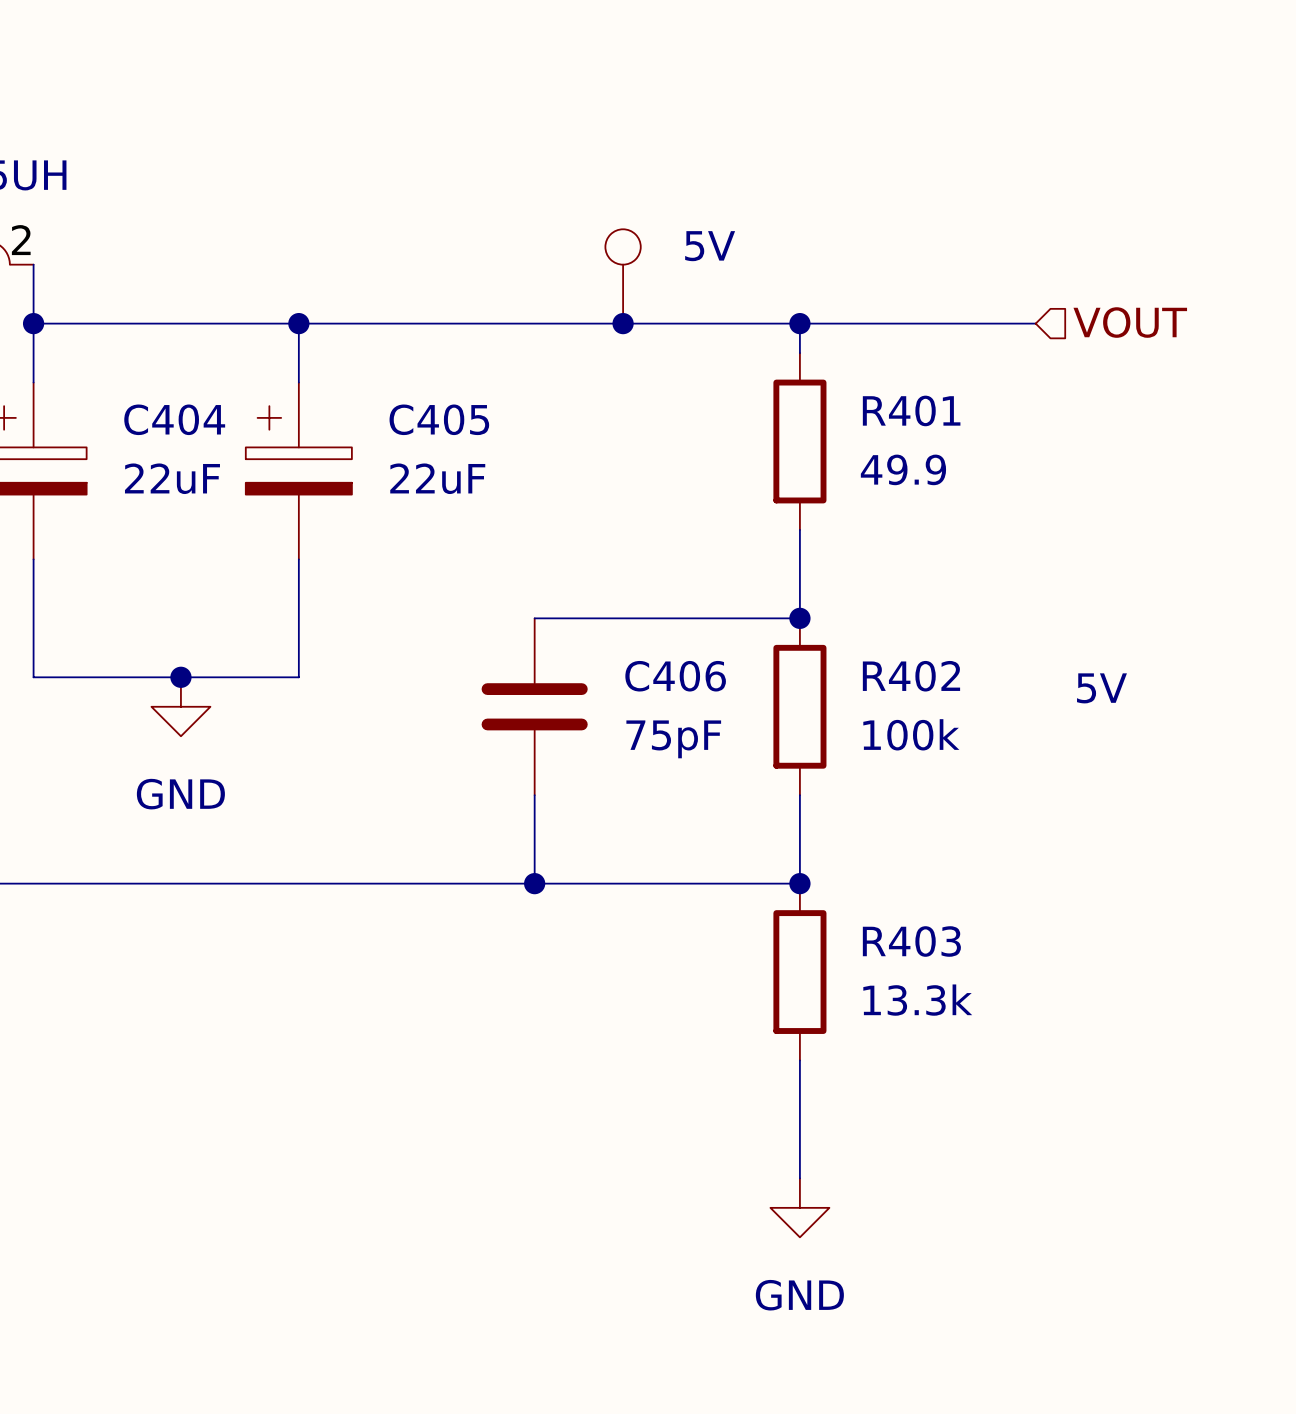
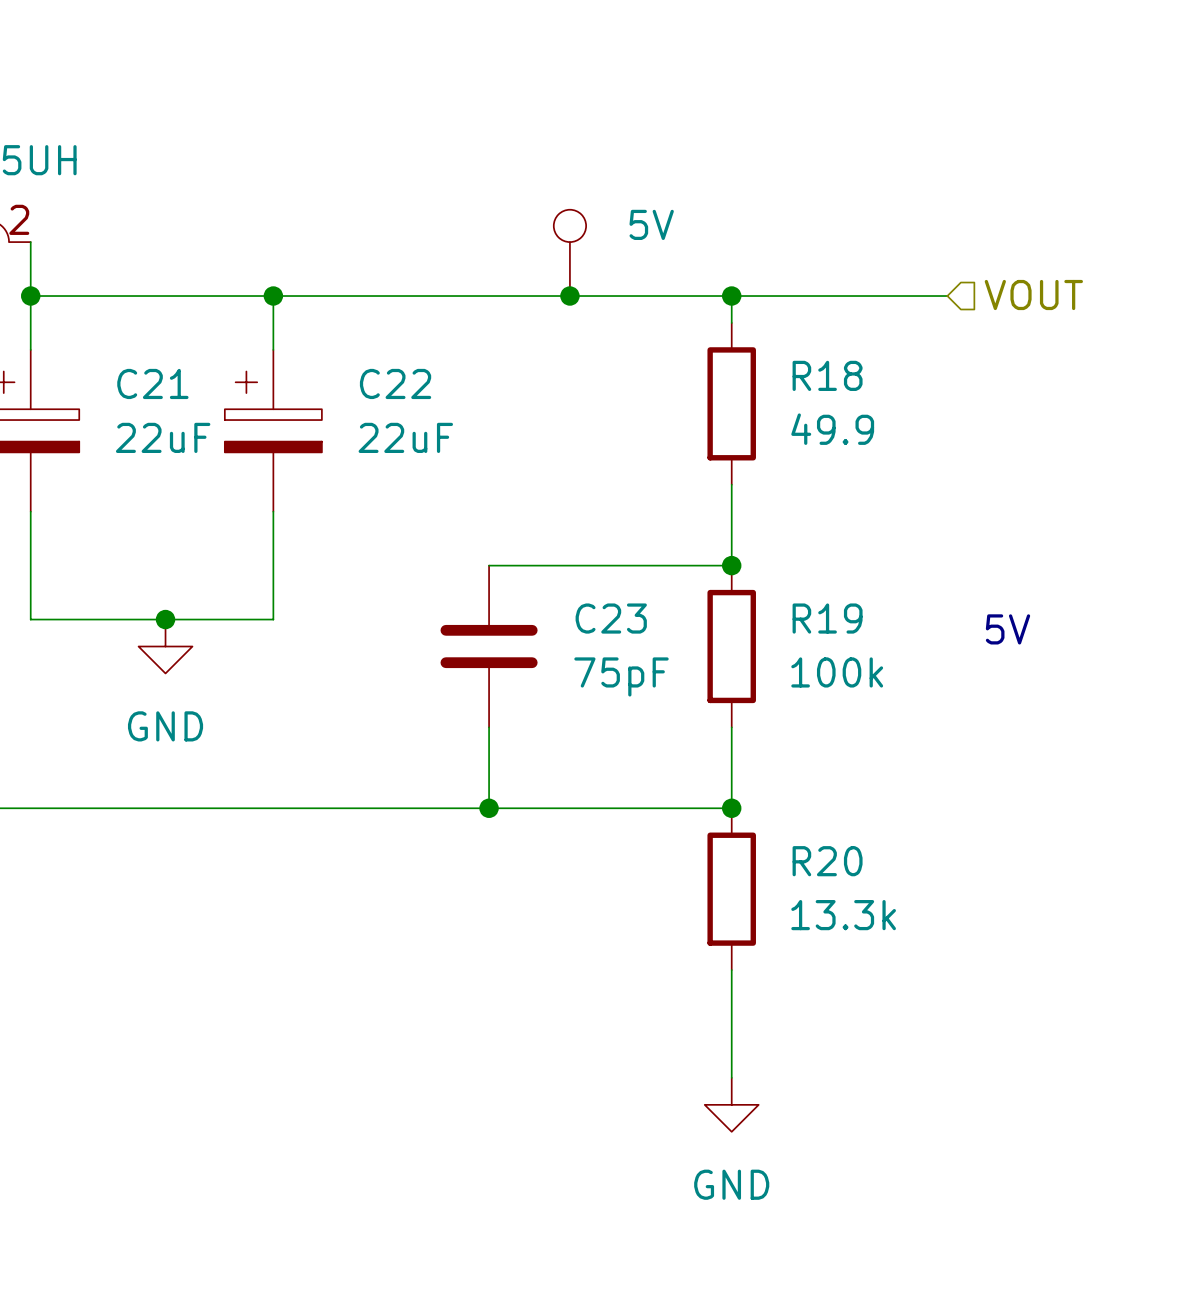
R401 name: R401 (911, 410) -> R18 (827, 375)
C404 name: C404 (174, 419) -> C21 (152, 383)
C405 name: C405 (439, 419) -> C22 (395, 383)
C406 name: C406 (675, 676) -> C23 (611, 618)
R402 name: R402 (911, 676) -> R19 (827, 618)
R403 name: R403 (911, 941) -> R20 (827, 861)

